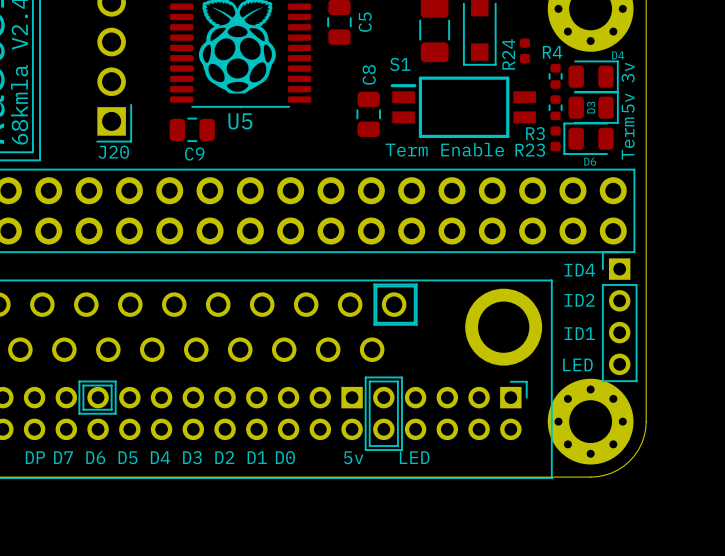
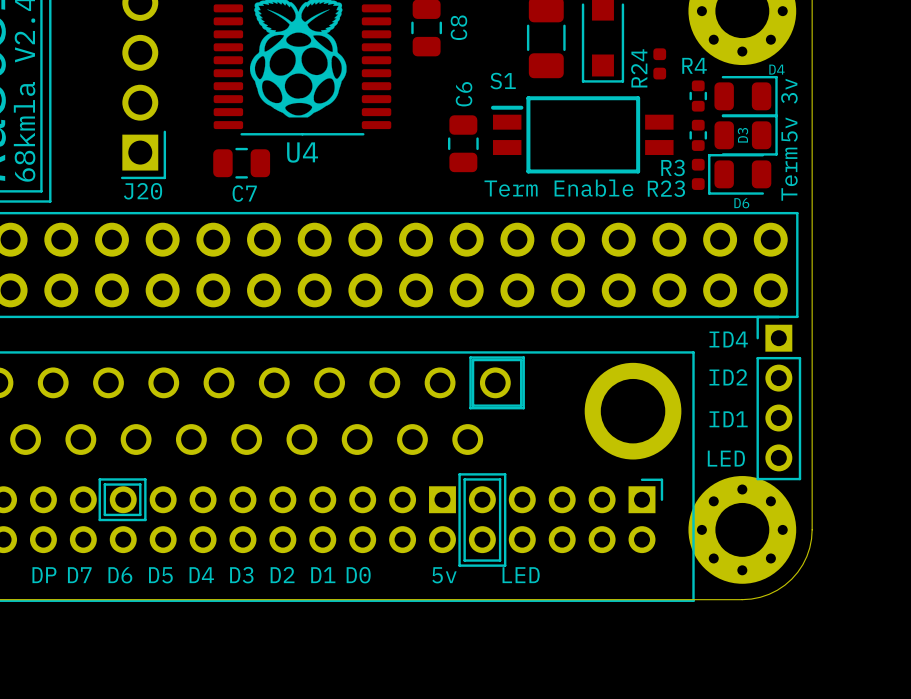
C5 name: C5 (365, 22) -> C8 (458, 27)
C8 name: C8 (369, 74) -> C6 (464, 94)
U5 name: U5 (240, 121) -> U4 (302, 152)
C9 name: C9 (194, 153) -> C7 (244, 193)

